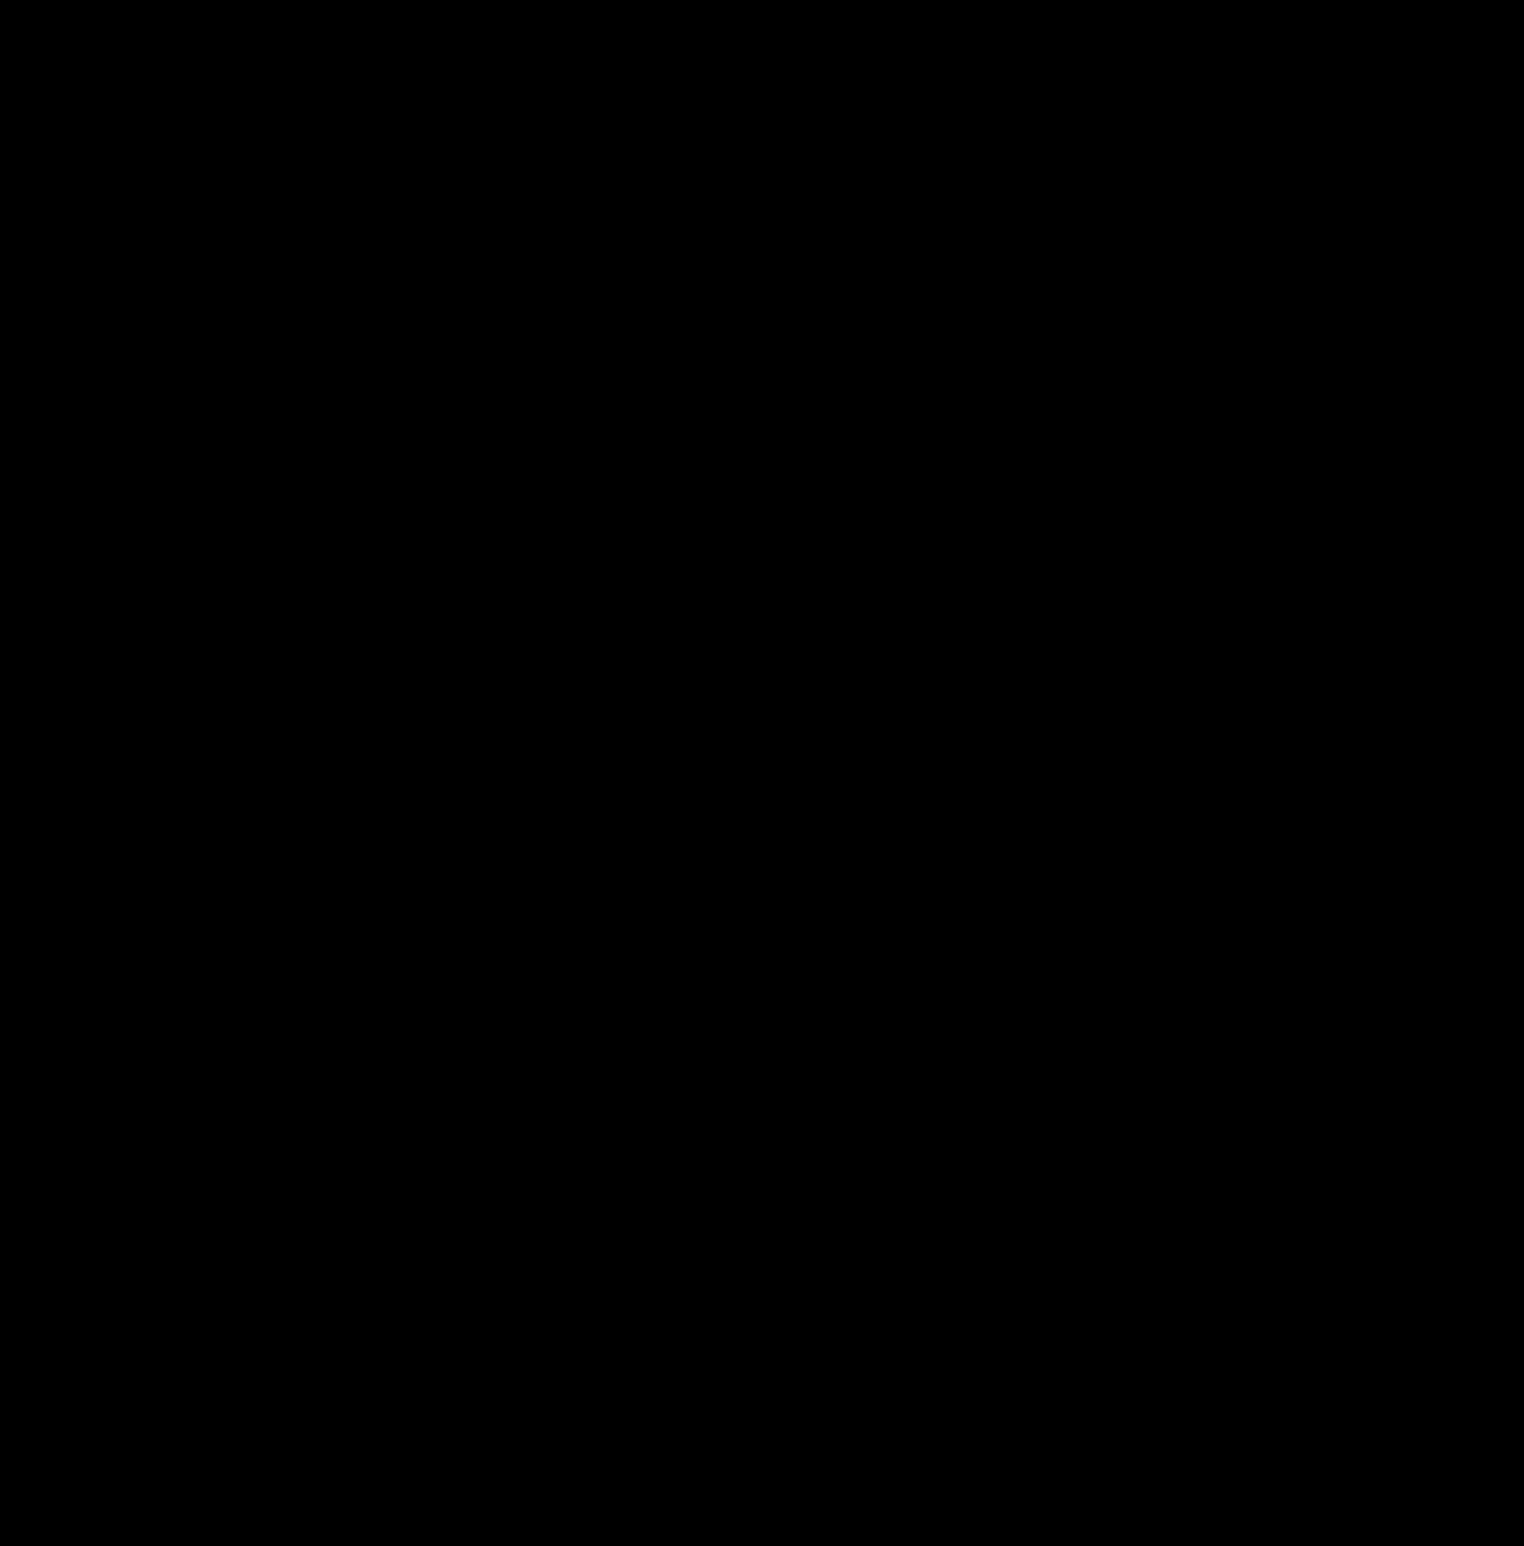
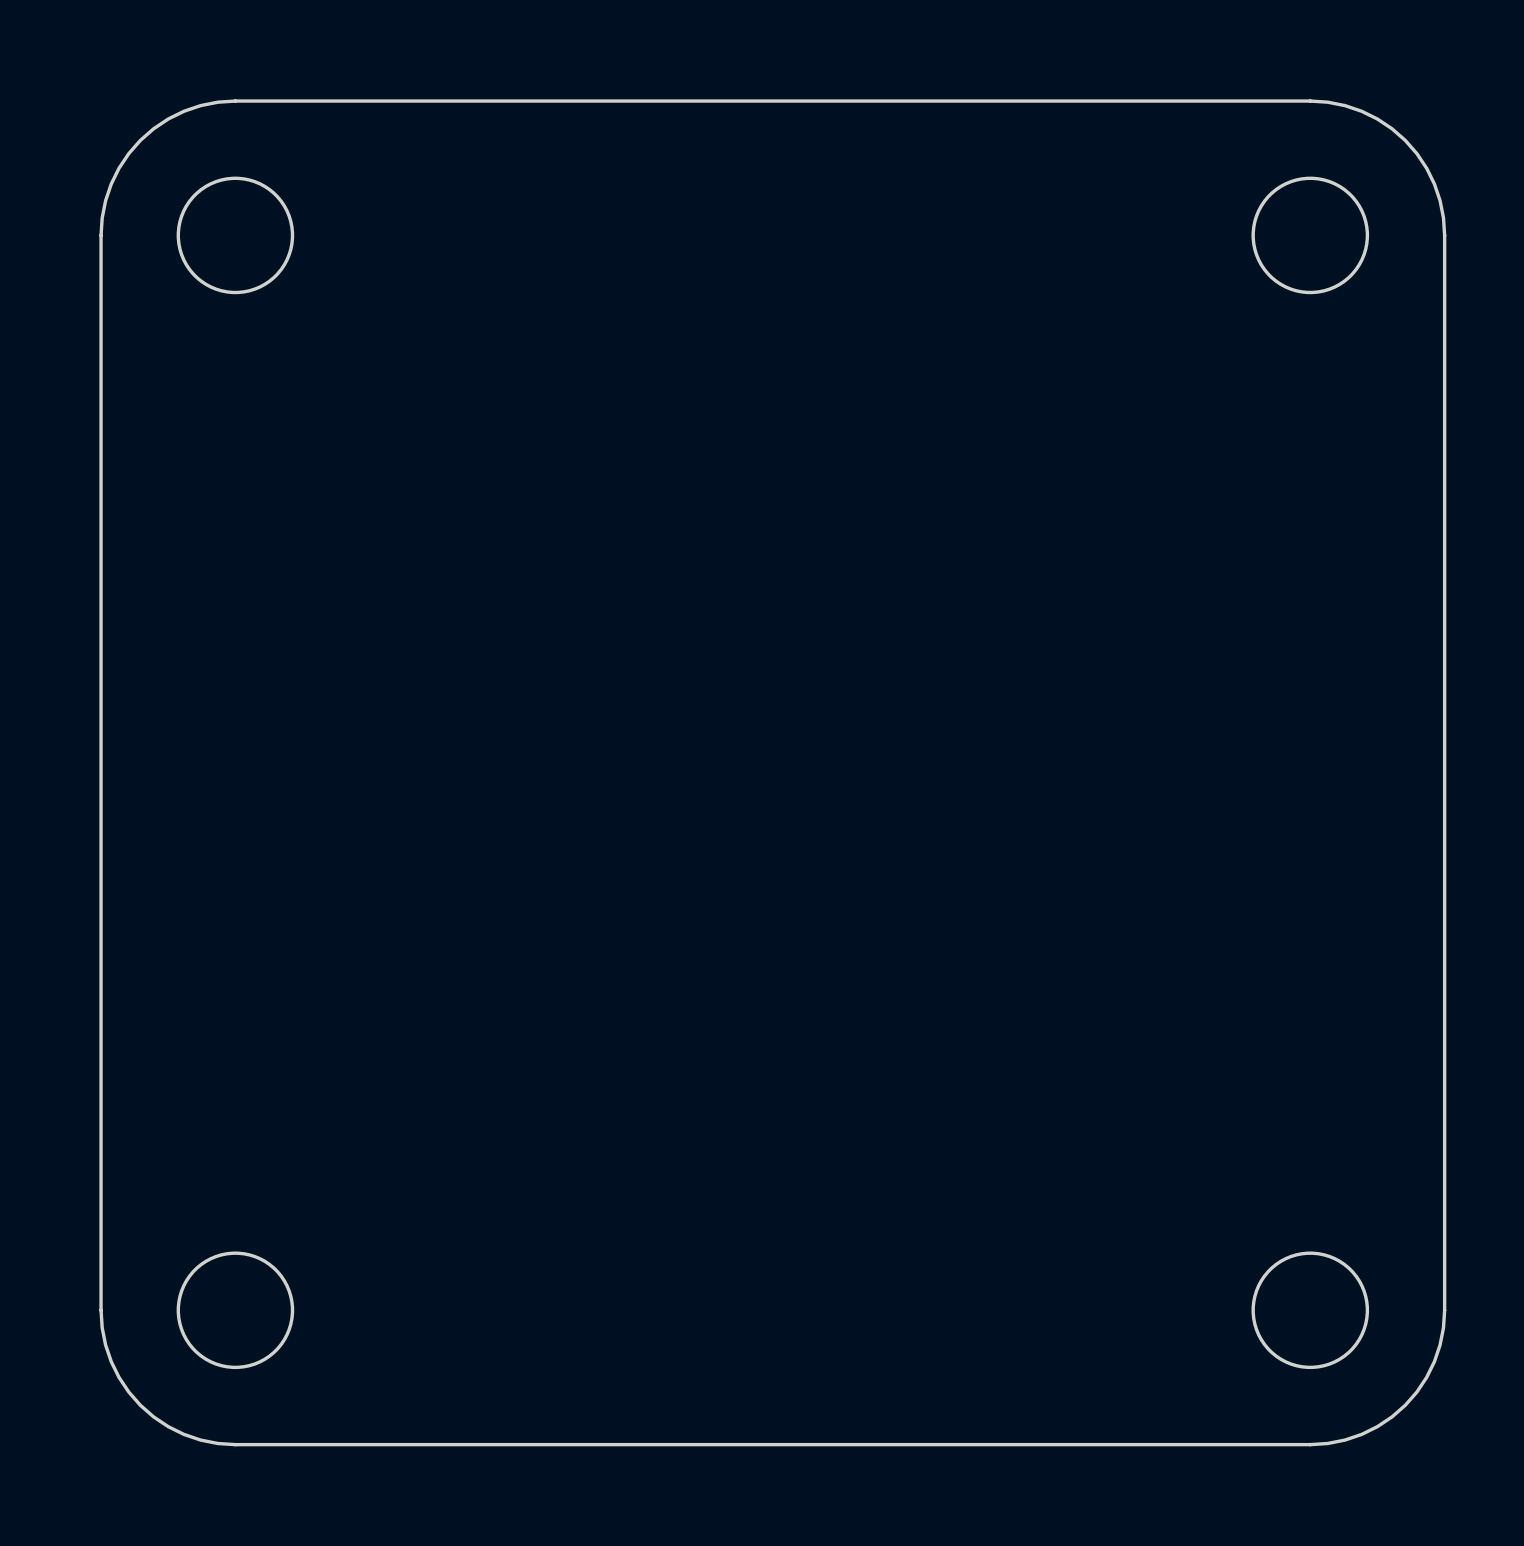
board edge: none -> (1310, 101) (235, 101) (200, 105) (183, 111) (153, 128) (140, 140) (128, 153) (111, 183) (105, 200) (101, 235) (101, 1310) (102, 1327) (111, 1361) (128, 1392) (140, 1405) (153, 1416) (183, 1434) (200, 1440) (235, 1444) (1310, 1444) (1327, 1443) (1361, 1434) (1392, 1416) (1405, 1405) (1426, 1377) (1434, 1361) (1443, 1327) (1444, 1310) (1443, 217) (1434, 183) (1426, 168) (1405, 140) (1392, 128) (1361, 111) (1345, 105) (1310, 101)
round board edge: none -> [176, 176, 295, 295]
round board edge: none -> [1251, 176, 1370, 295]
round board edge: none -> [176, 1251, 295, 1370]
round board edge: none -> [1251, 1251, 1370, 1370]

